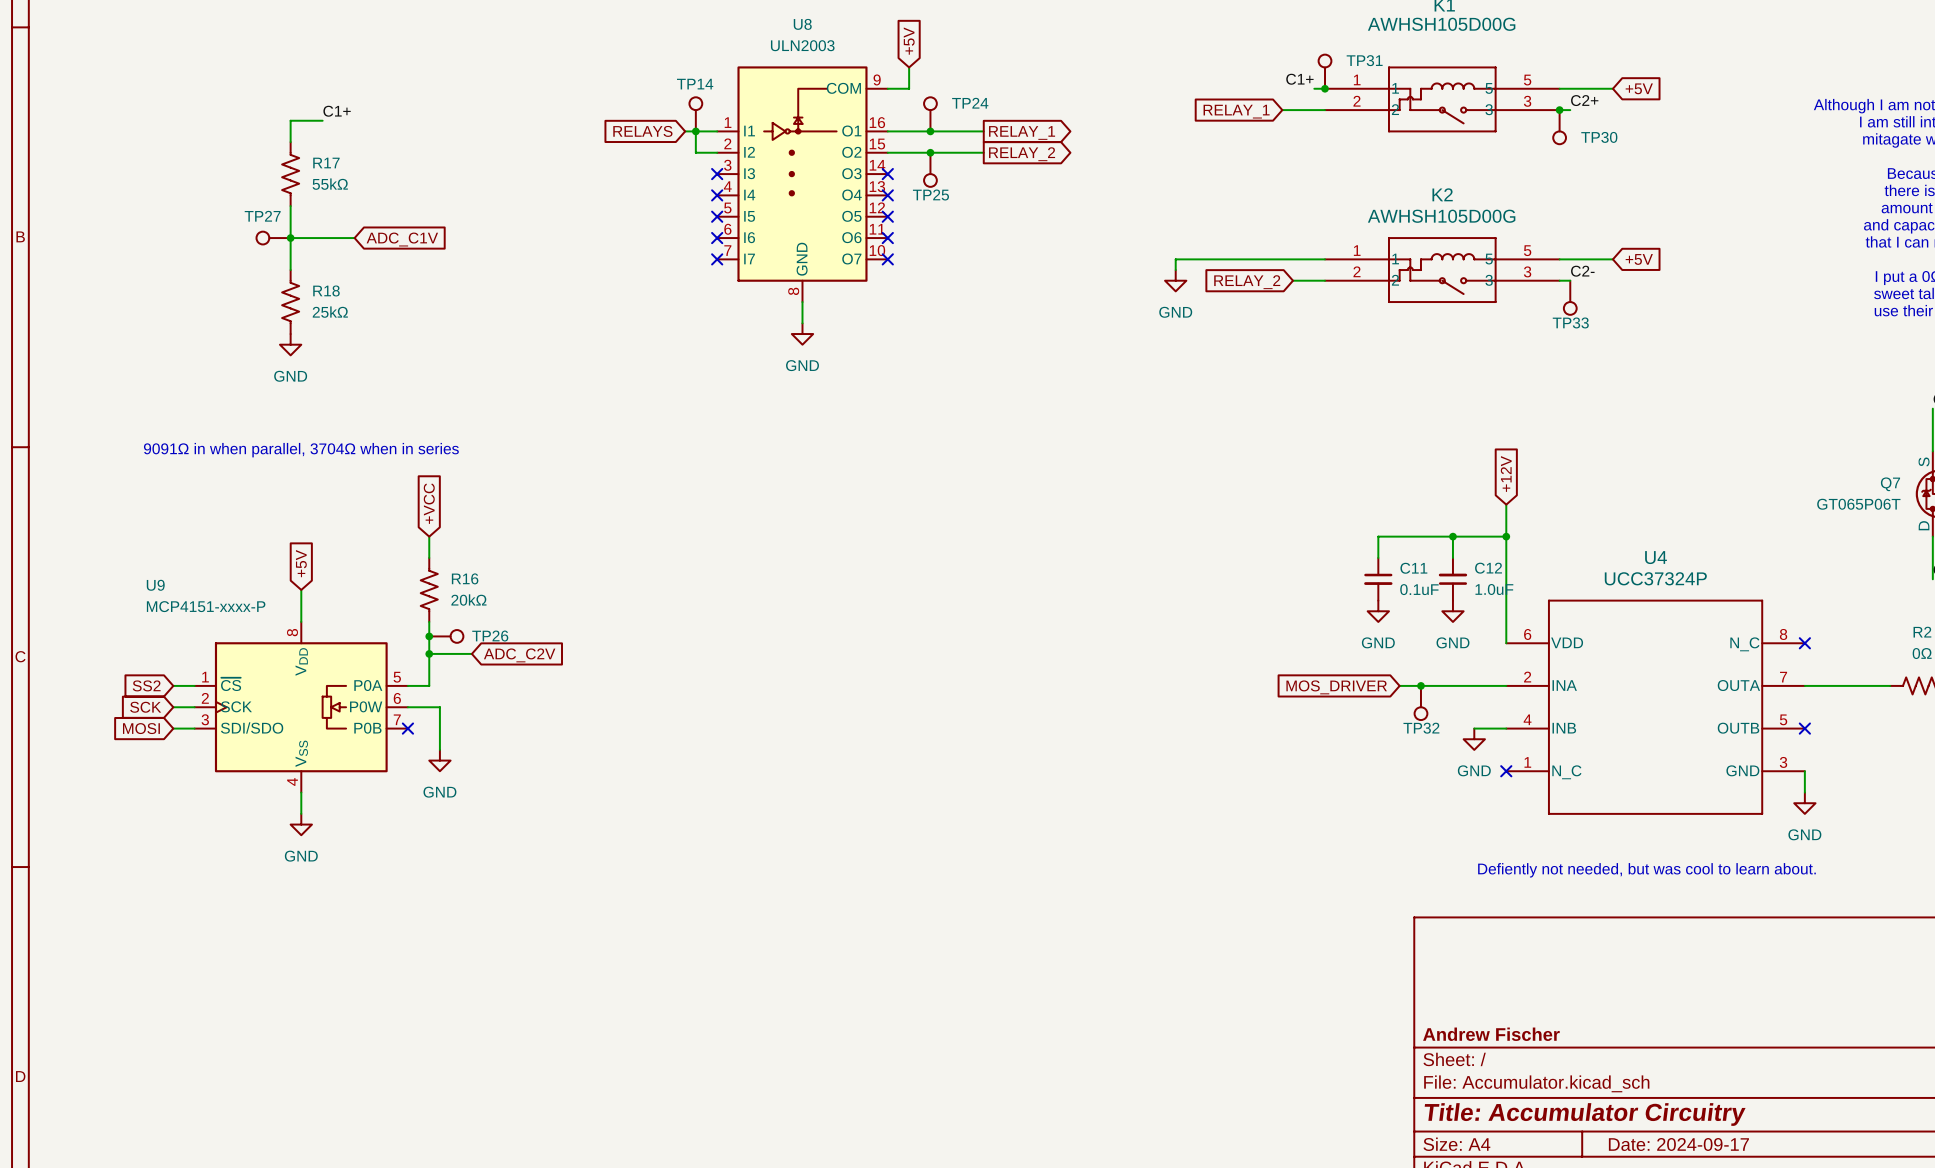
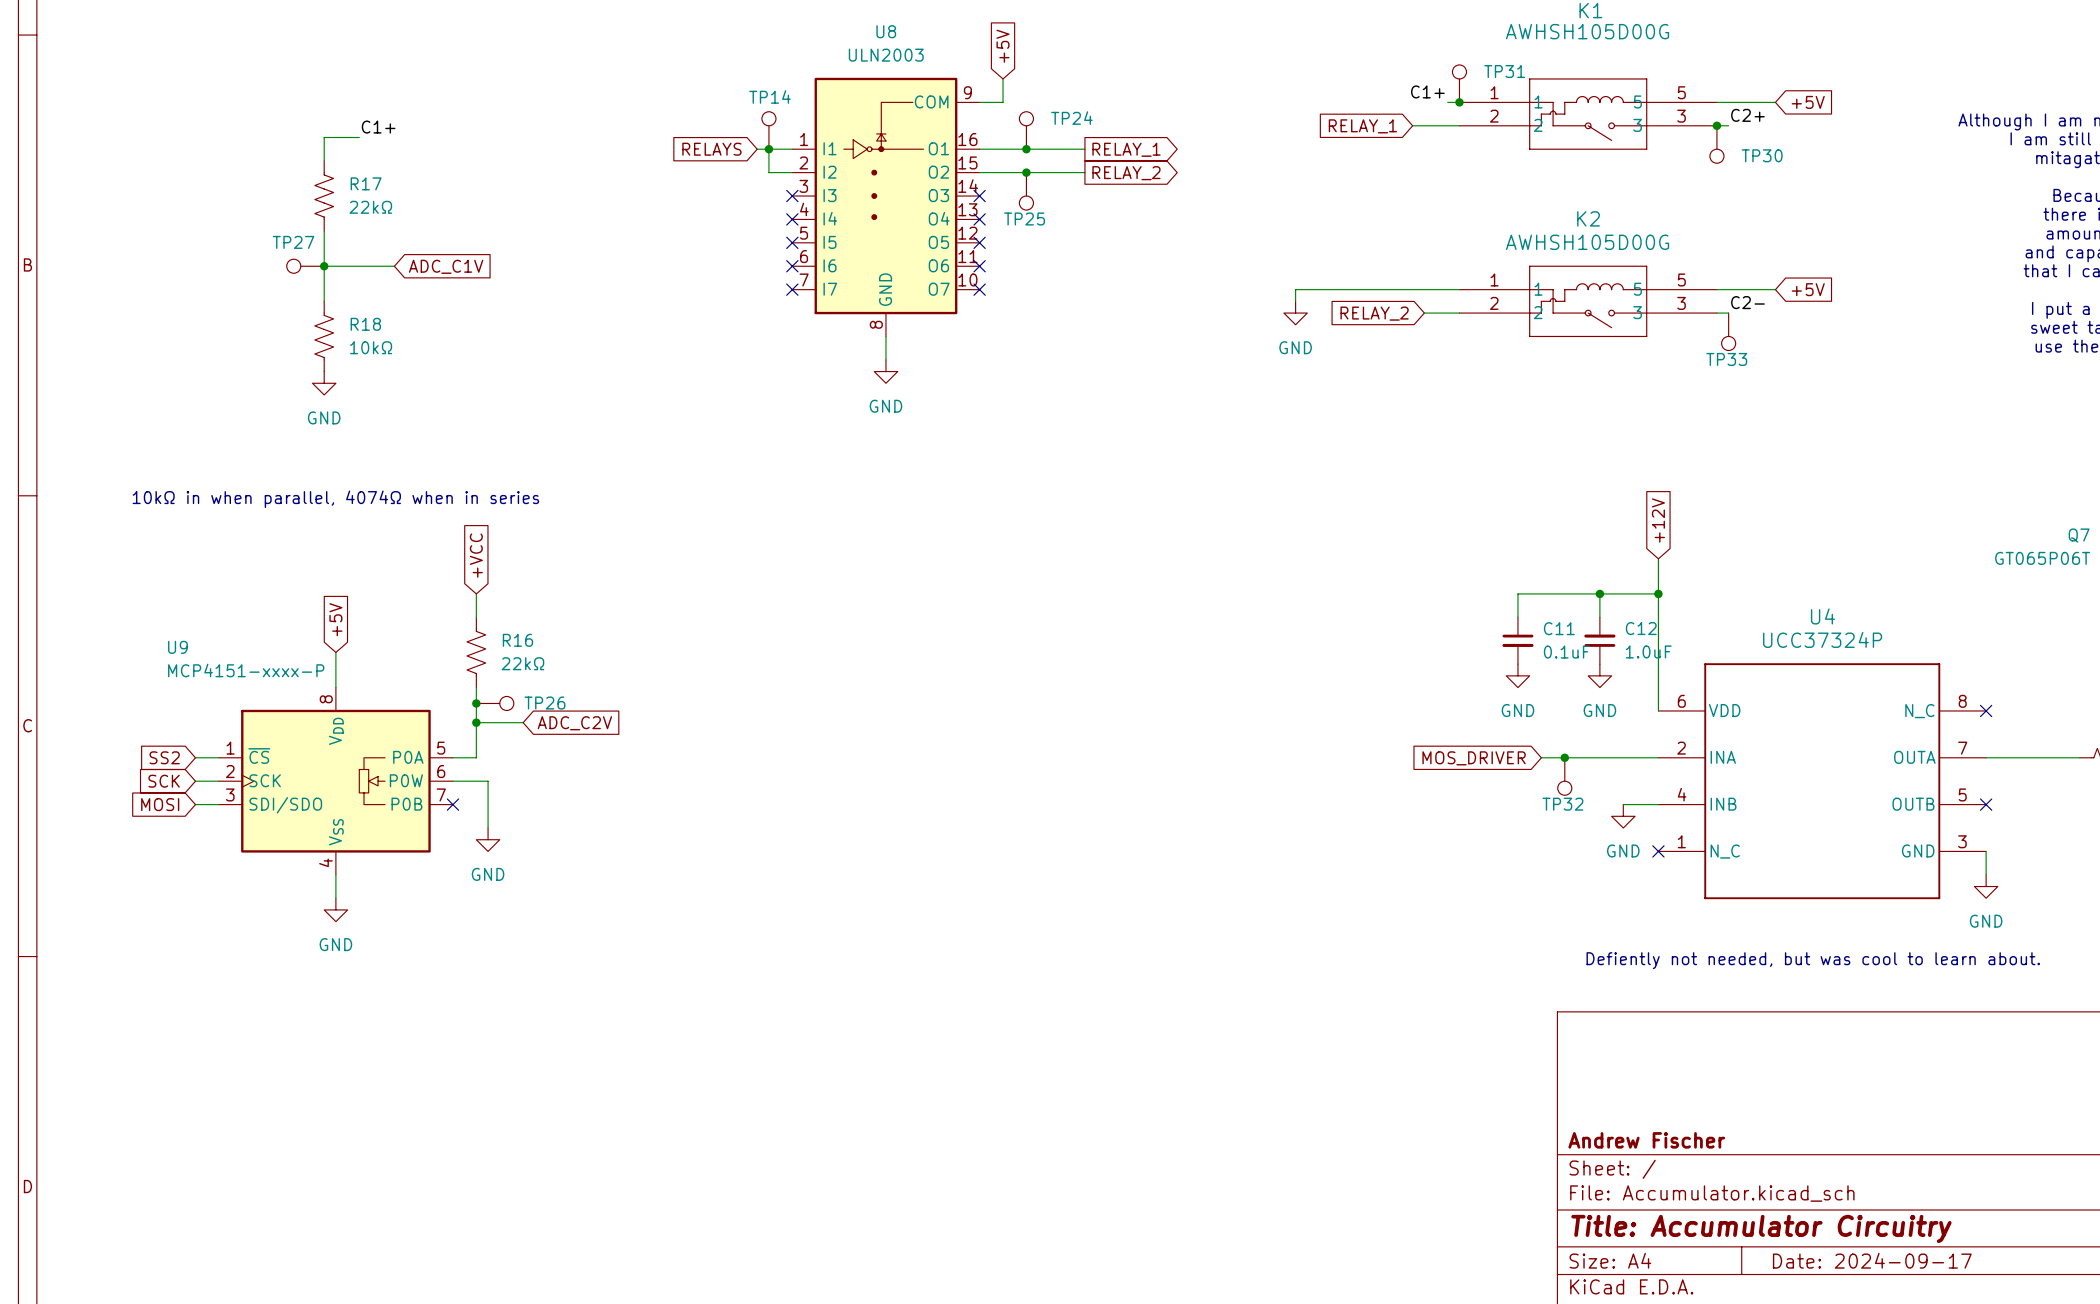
R17 value: 55kΩ (330, 184) -> 22kΩ (370, 207)
R18 value: 25kΩ (330, 312) -> 10kΩ (371, 347)
text: 9091Ω in when parallel, 3704Ω when in series (301, 450) -> 10kΩ in when parallel, 4074Ω when in series (335, 499)
R16 value: 20kΩ (468, 600) -> 22kΩ (522, 663)

